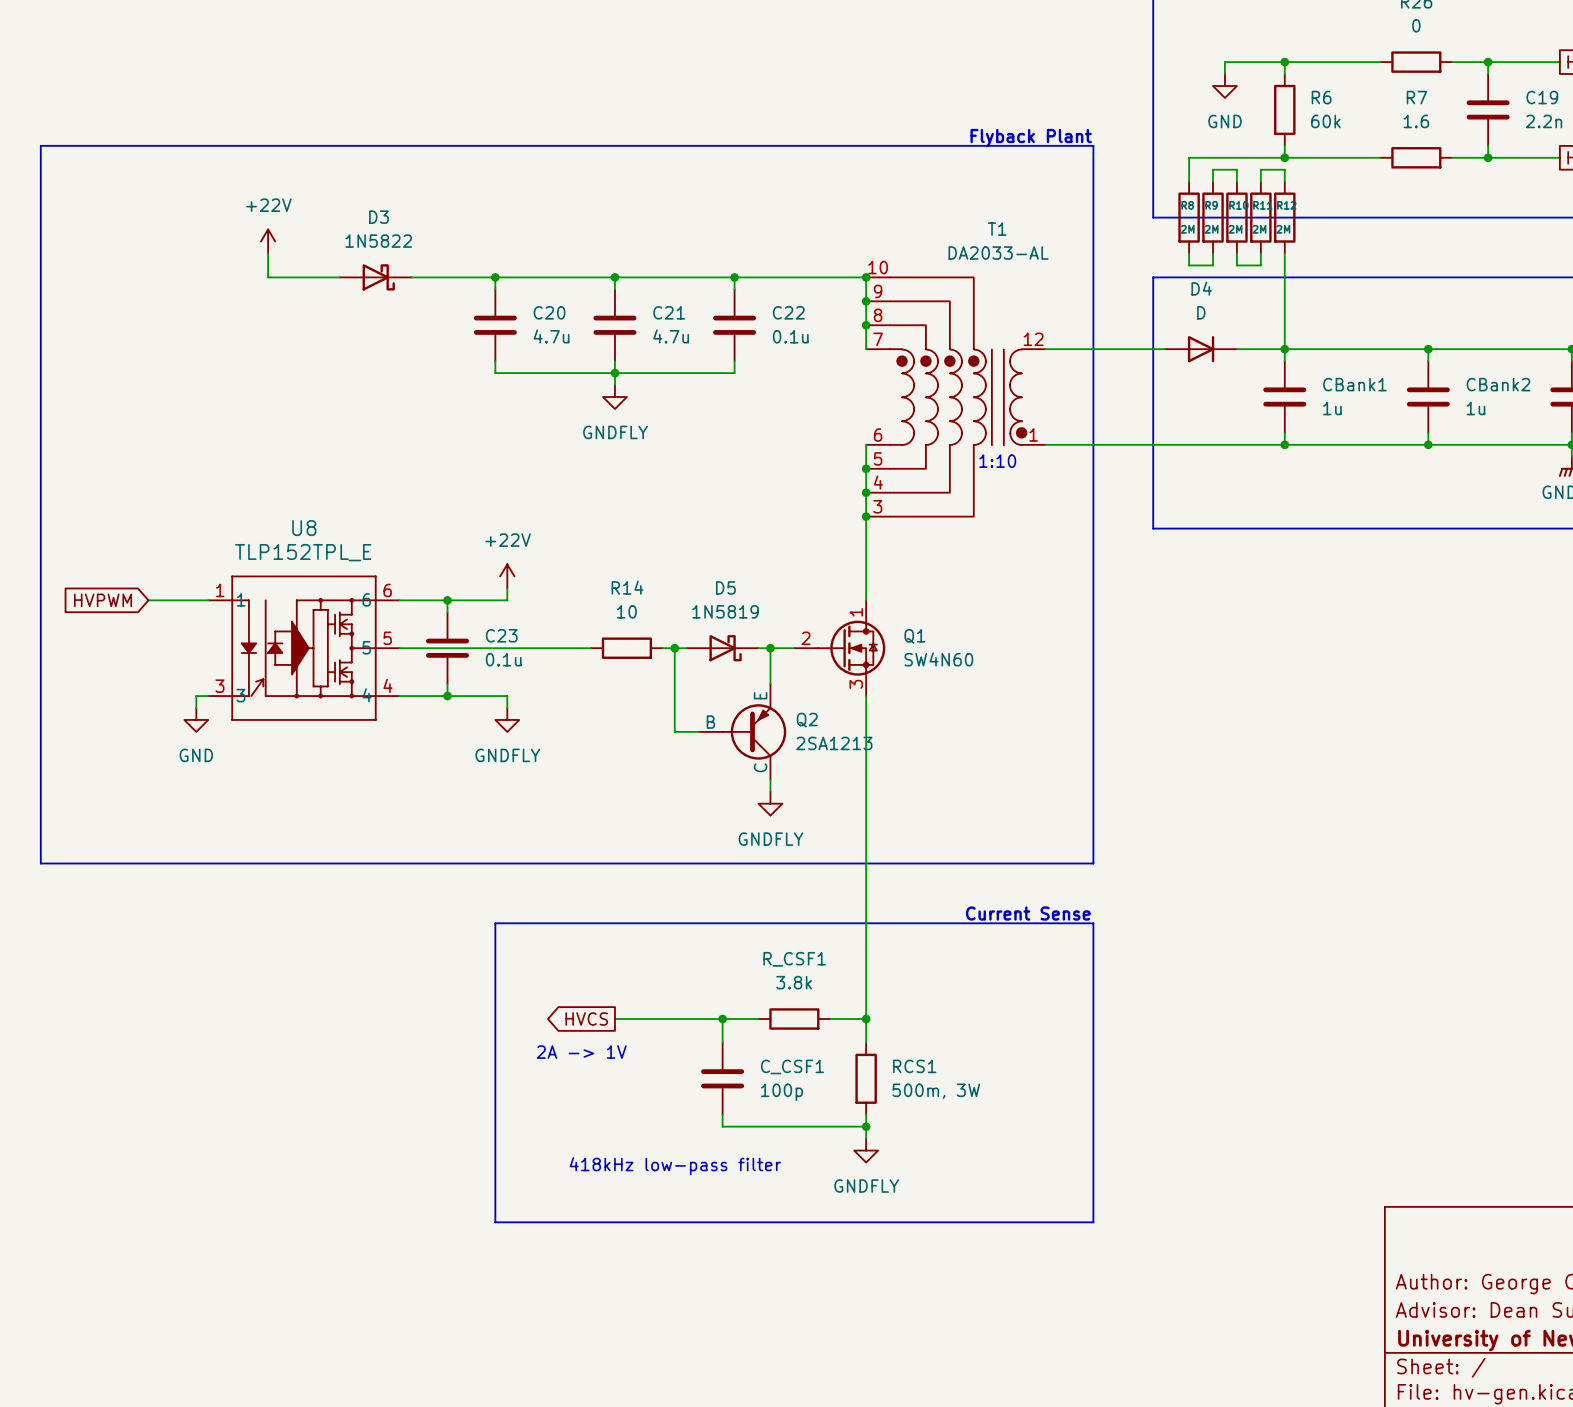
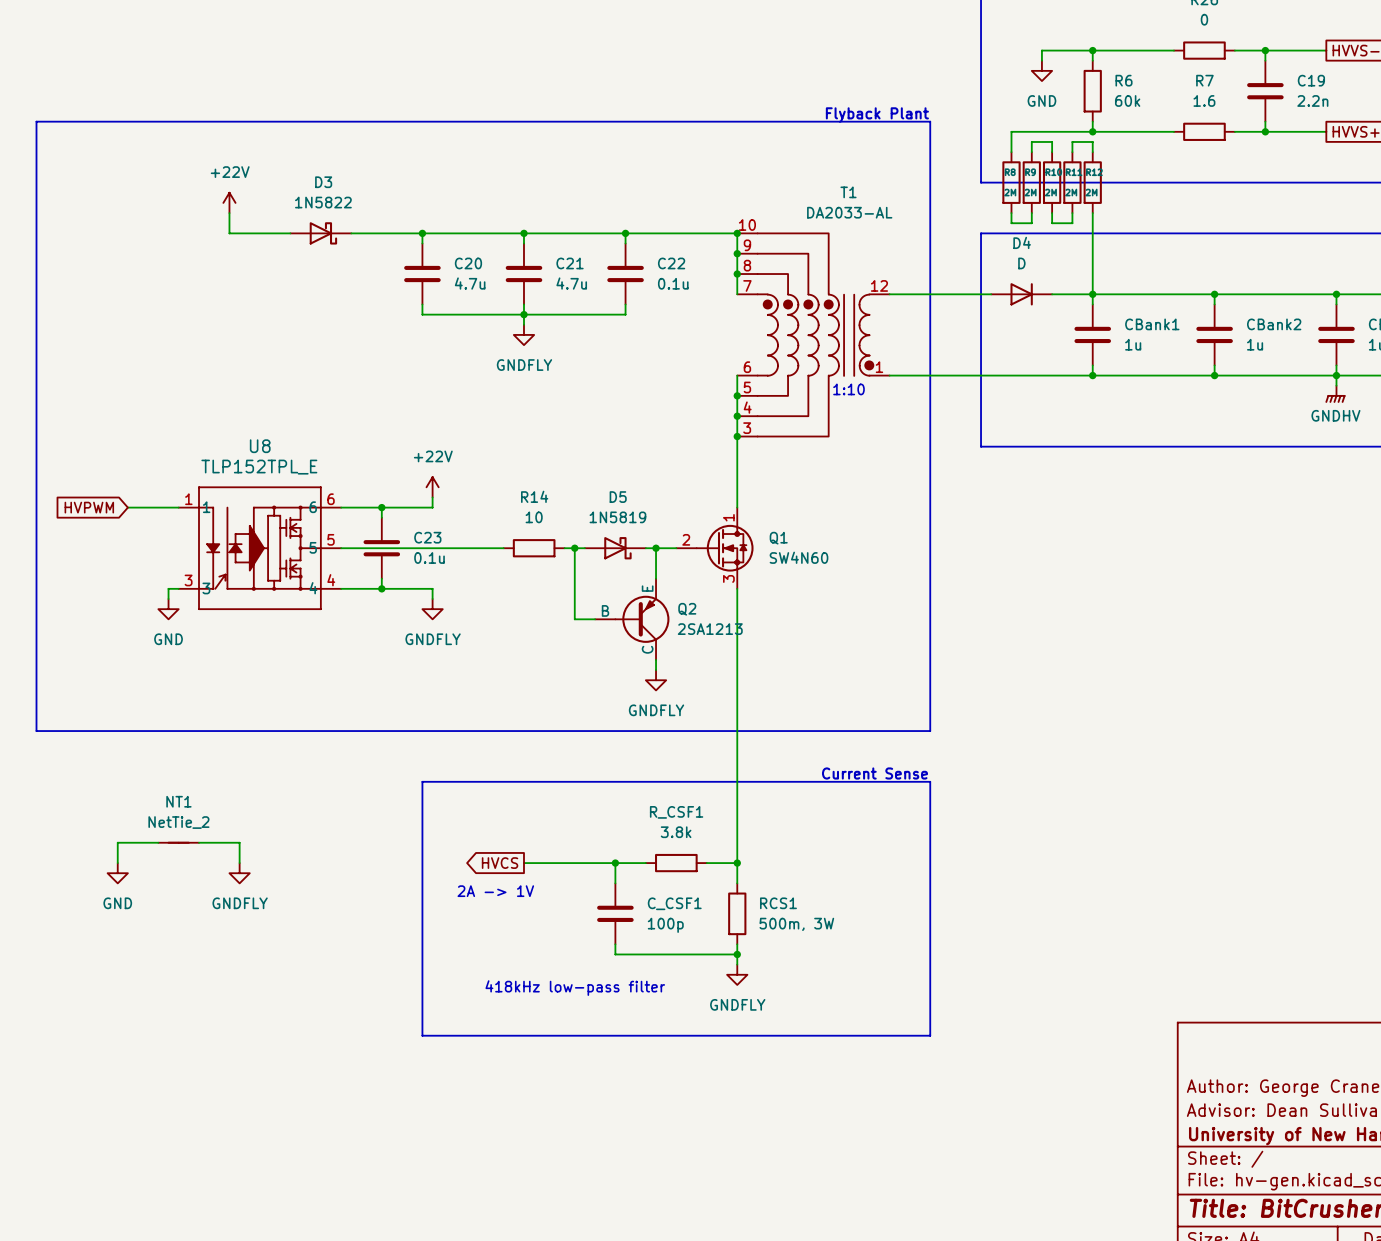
wire: none -> (158, 842) (117, 842) (117, 863)
NT1: none -> NetTie_2 (178, 842)
wire: none -> (199, 842) (239, 842) (239, 863)
power symbol: none -> GND (117, 873)
power symbol: none -> GNDFLY (239, 873)

